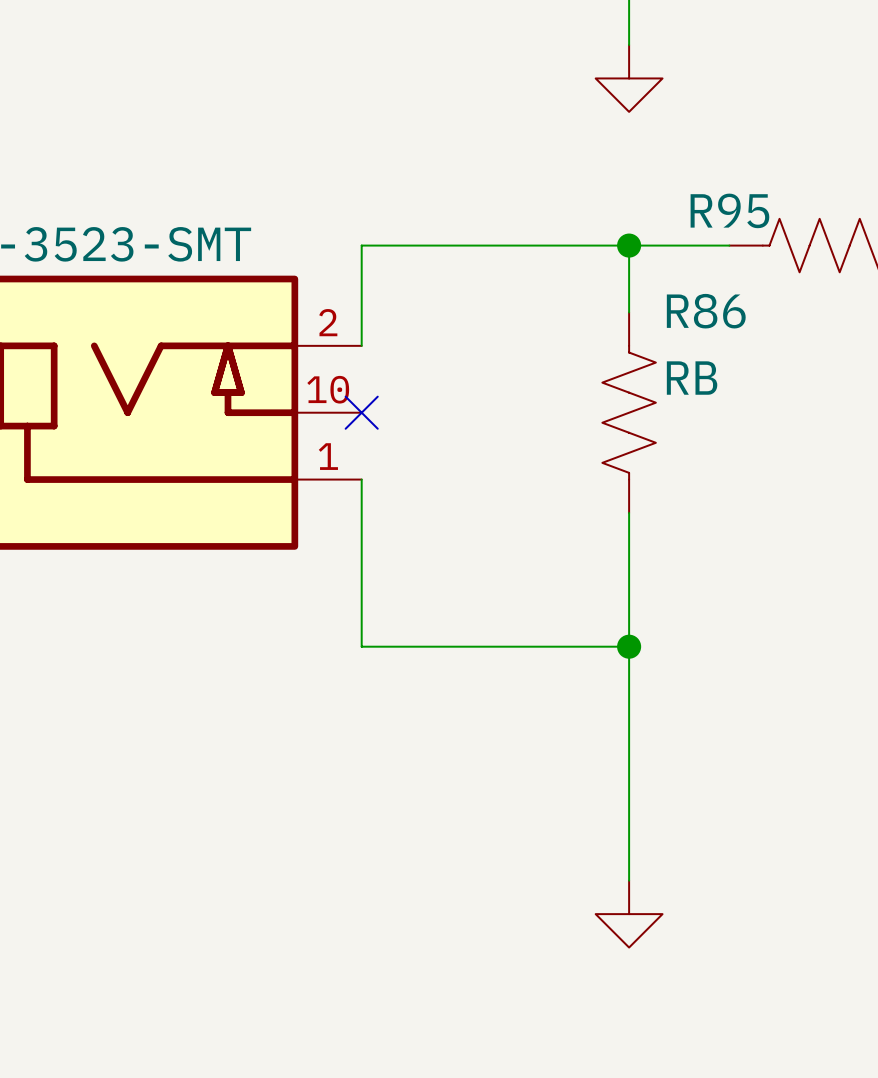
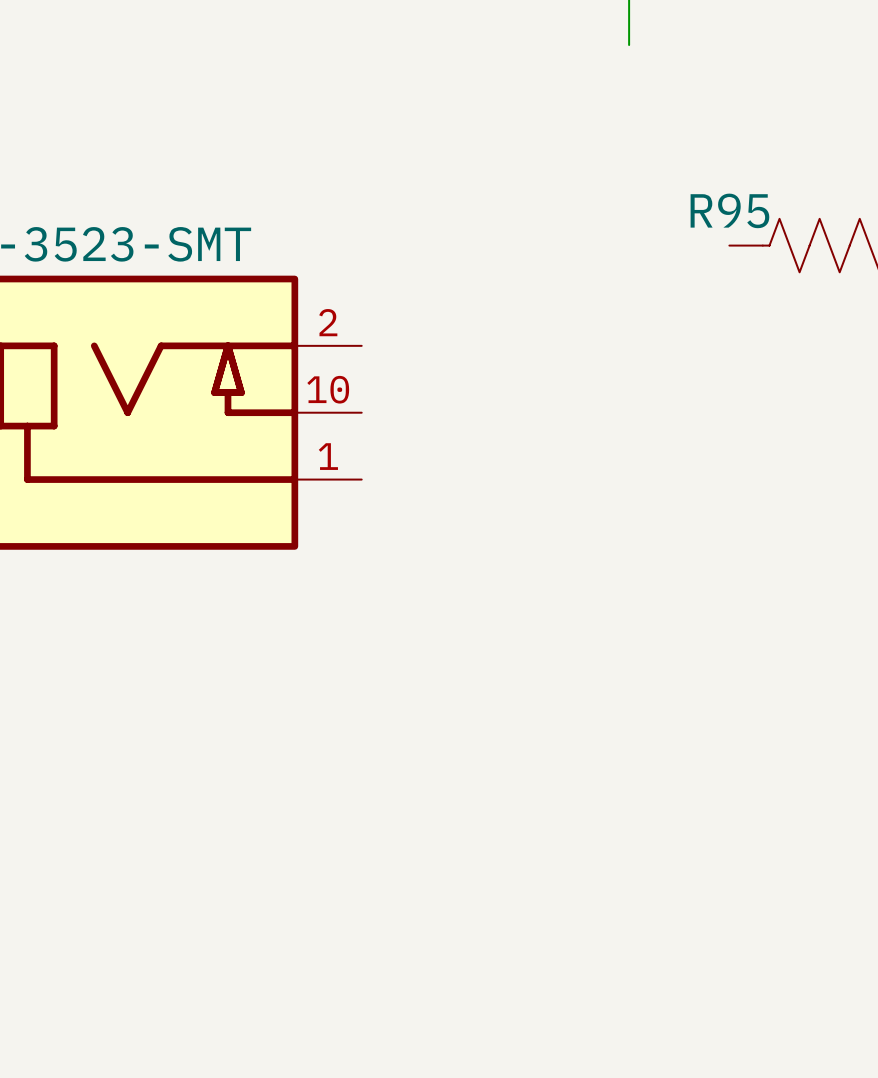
power symbol: (629, 78) -> none
wire: (629, 245) (629, 312) -> none
junction: (629, 245) -> none
wire: (729, 245) (361, 245) (361, 345) -> none
no-connect mark: (361, 412) -> none
R86: RB (629, 412) -> none
wire: (361, 479) (361, 646) (629, 646) -> none
wire: (629, 512) (629, 880) -> none
junction: (629, 646) -> none
power symbol: (629, 914) -> none

